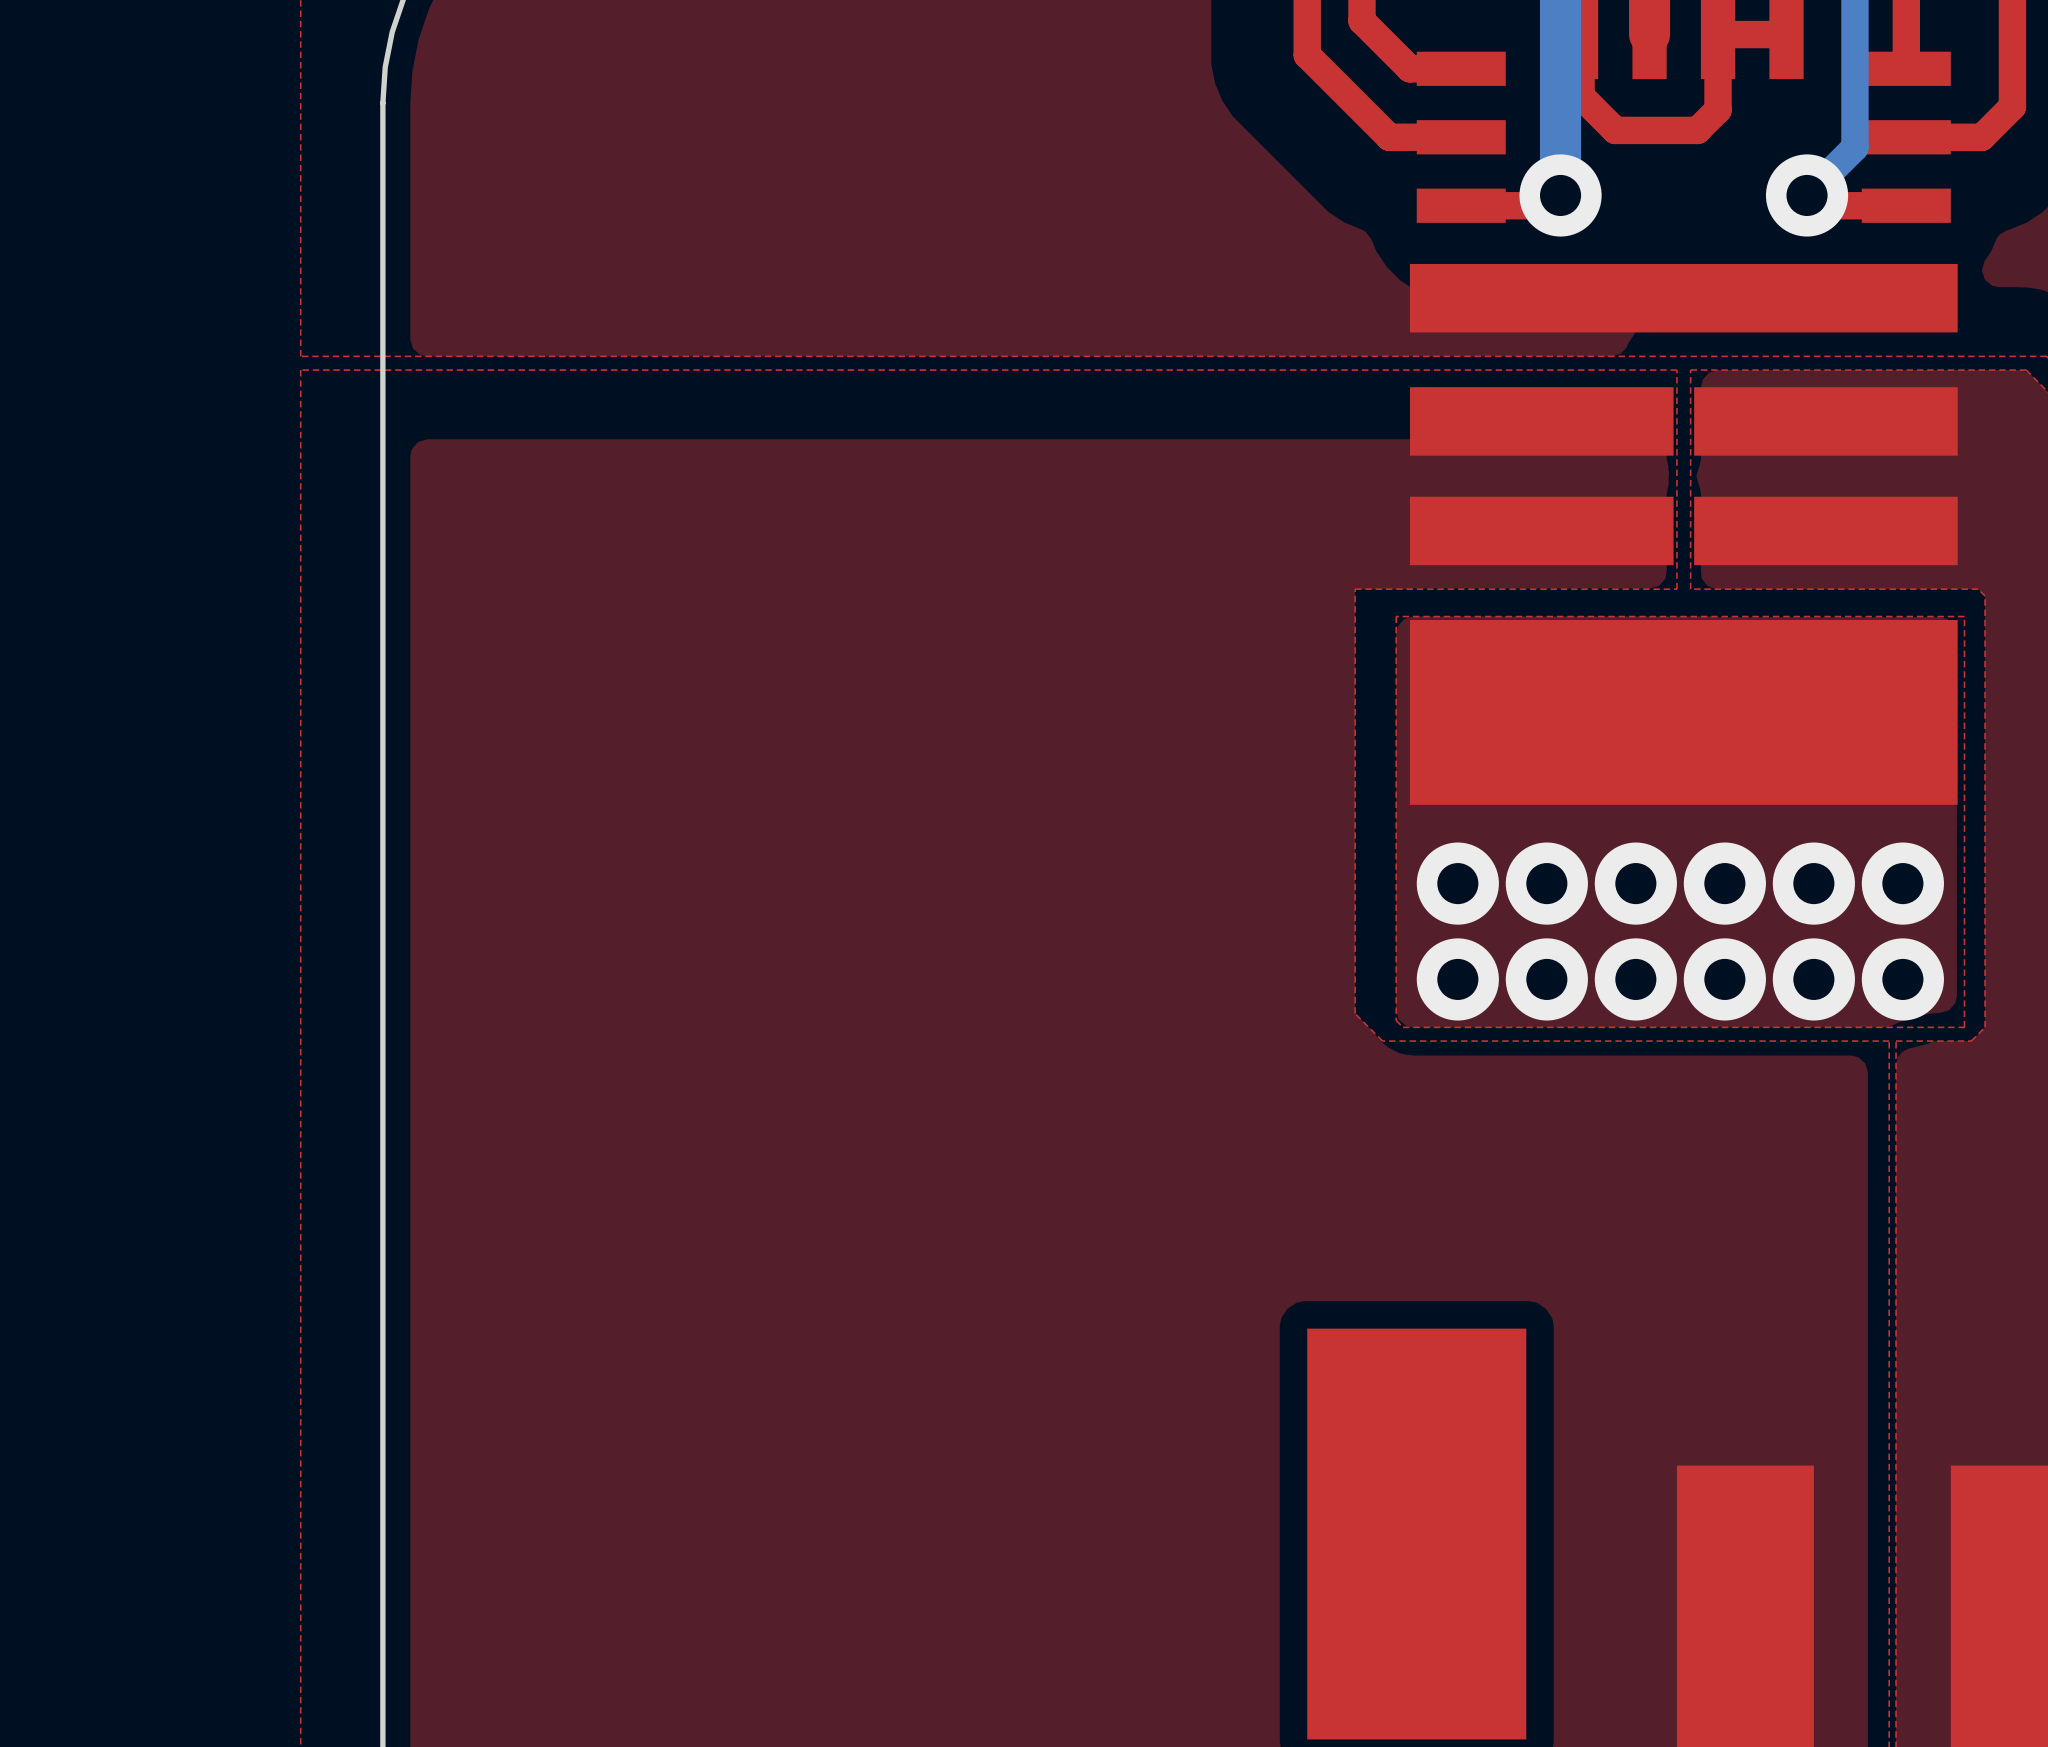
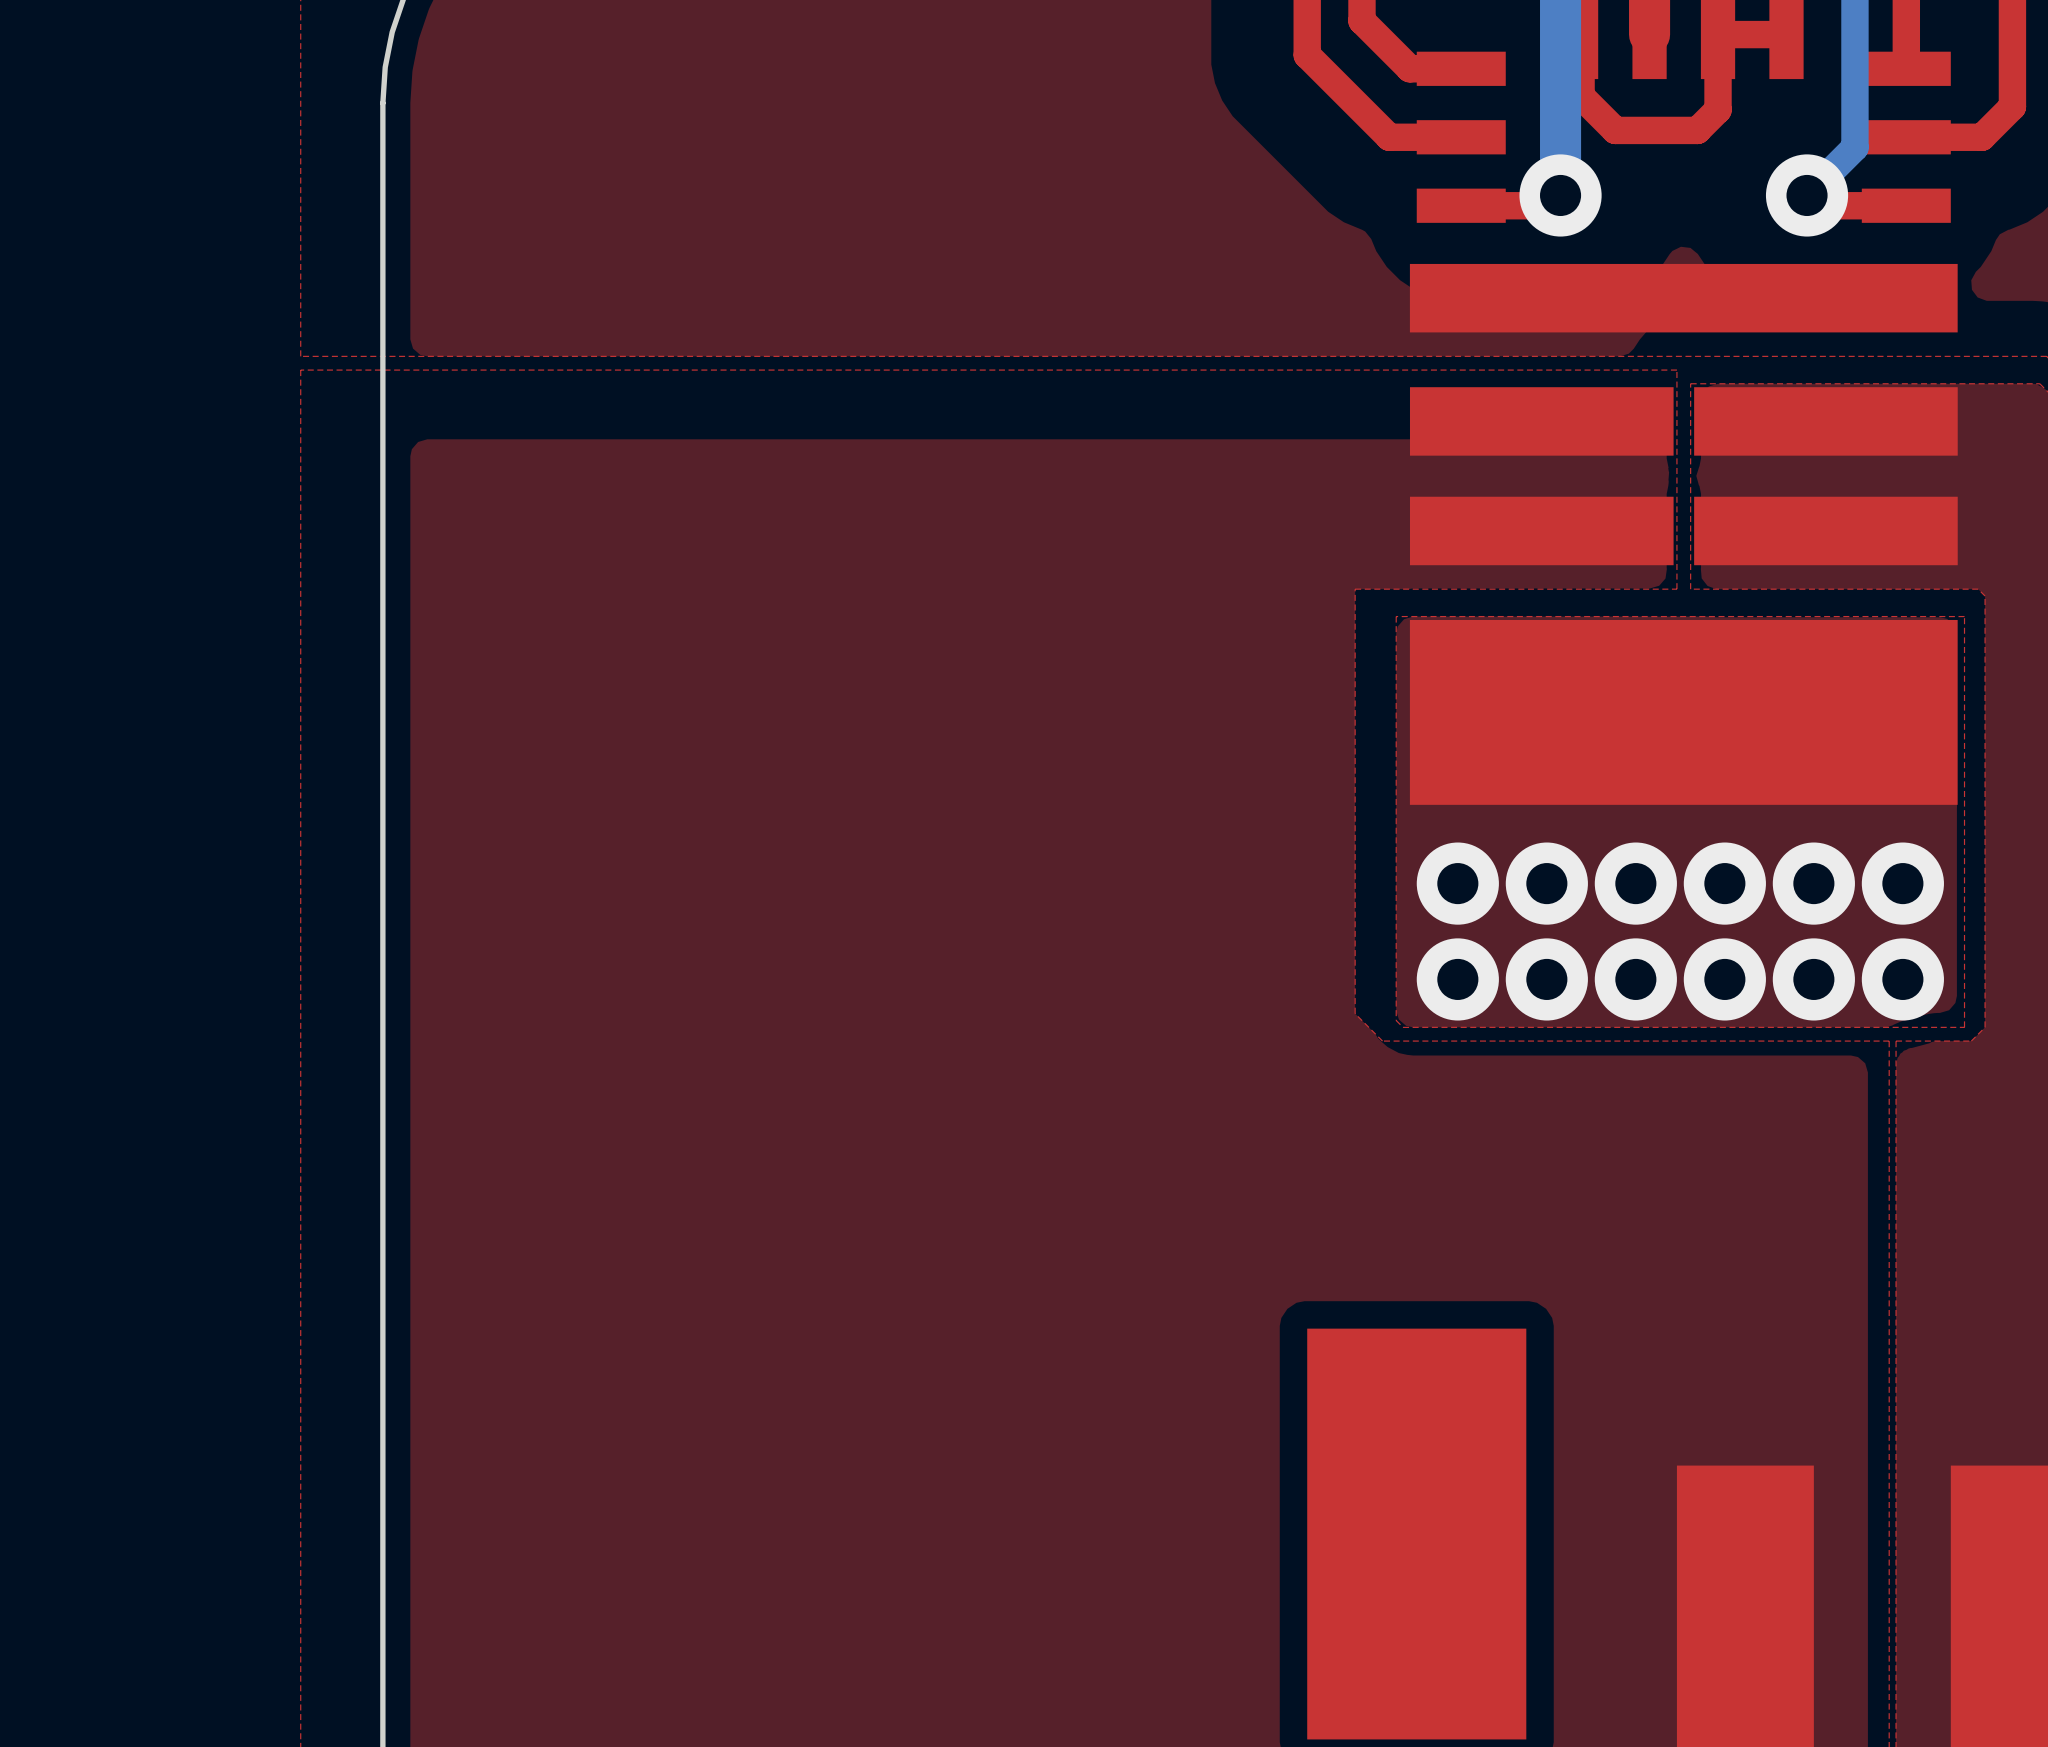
top zone outline: (2039, 383) (2026, 370) (1690, 370) (1690, 383) -> (2039, 383) (1690, 383)

